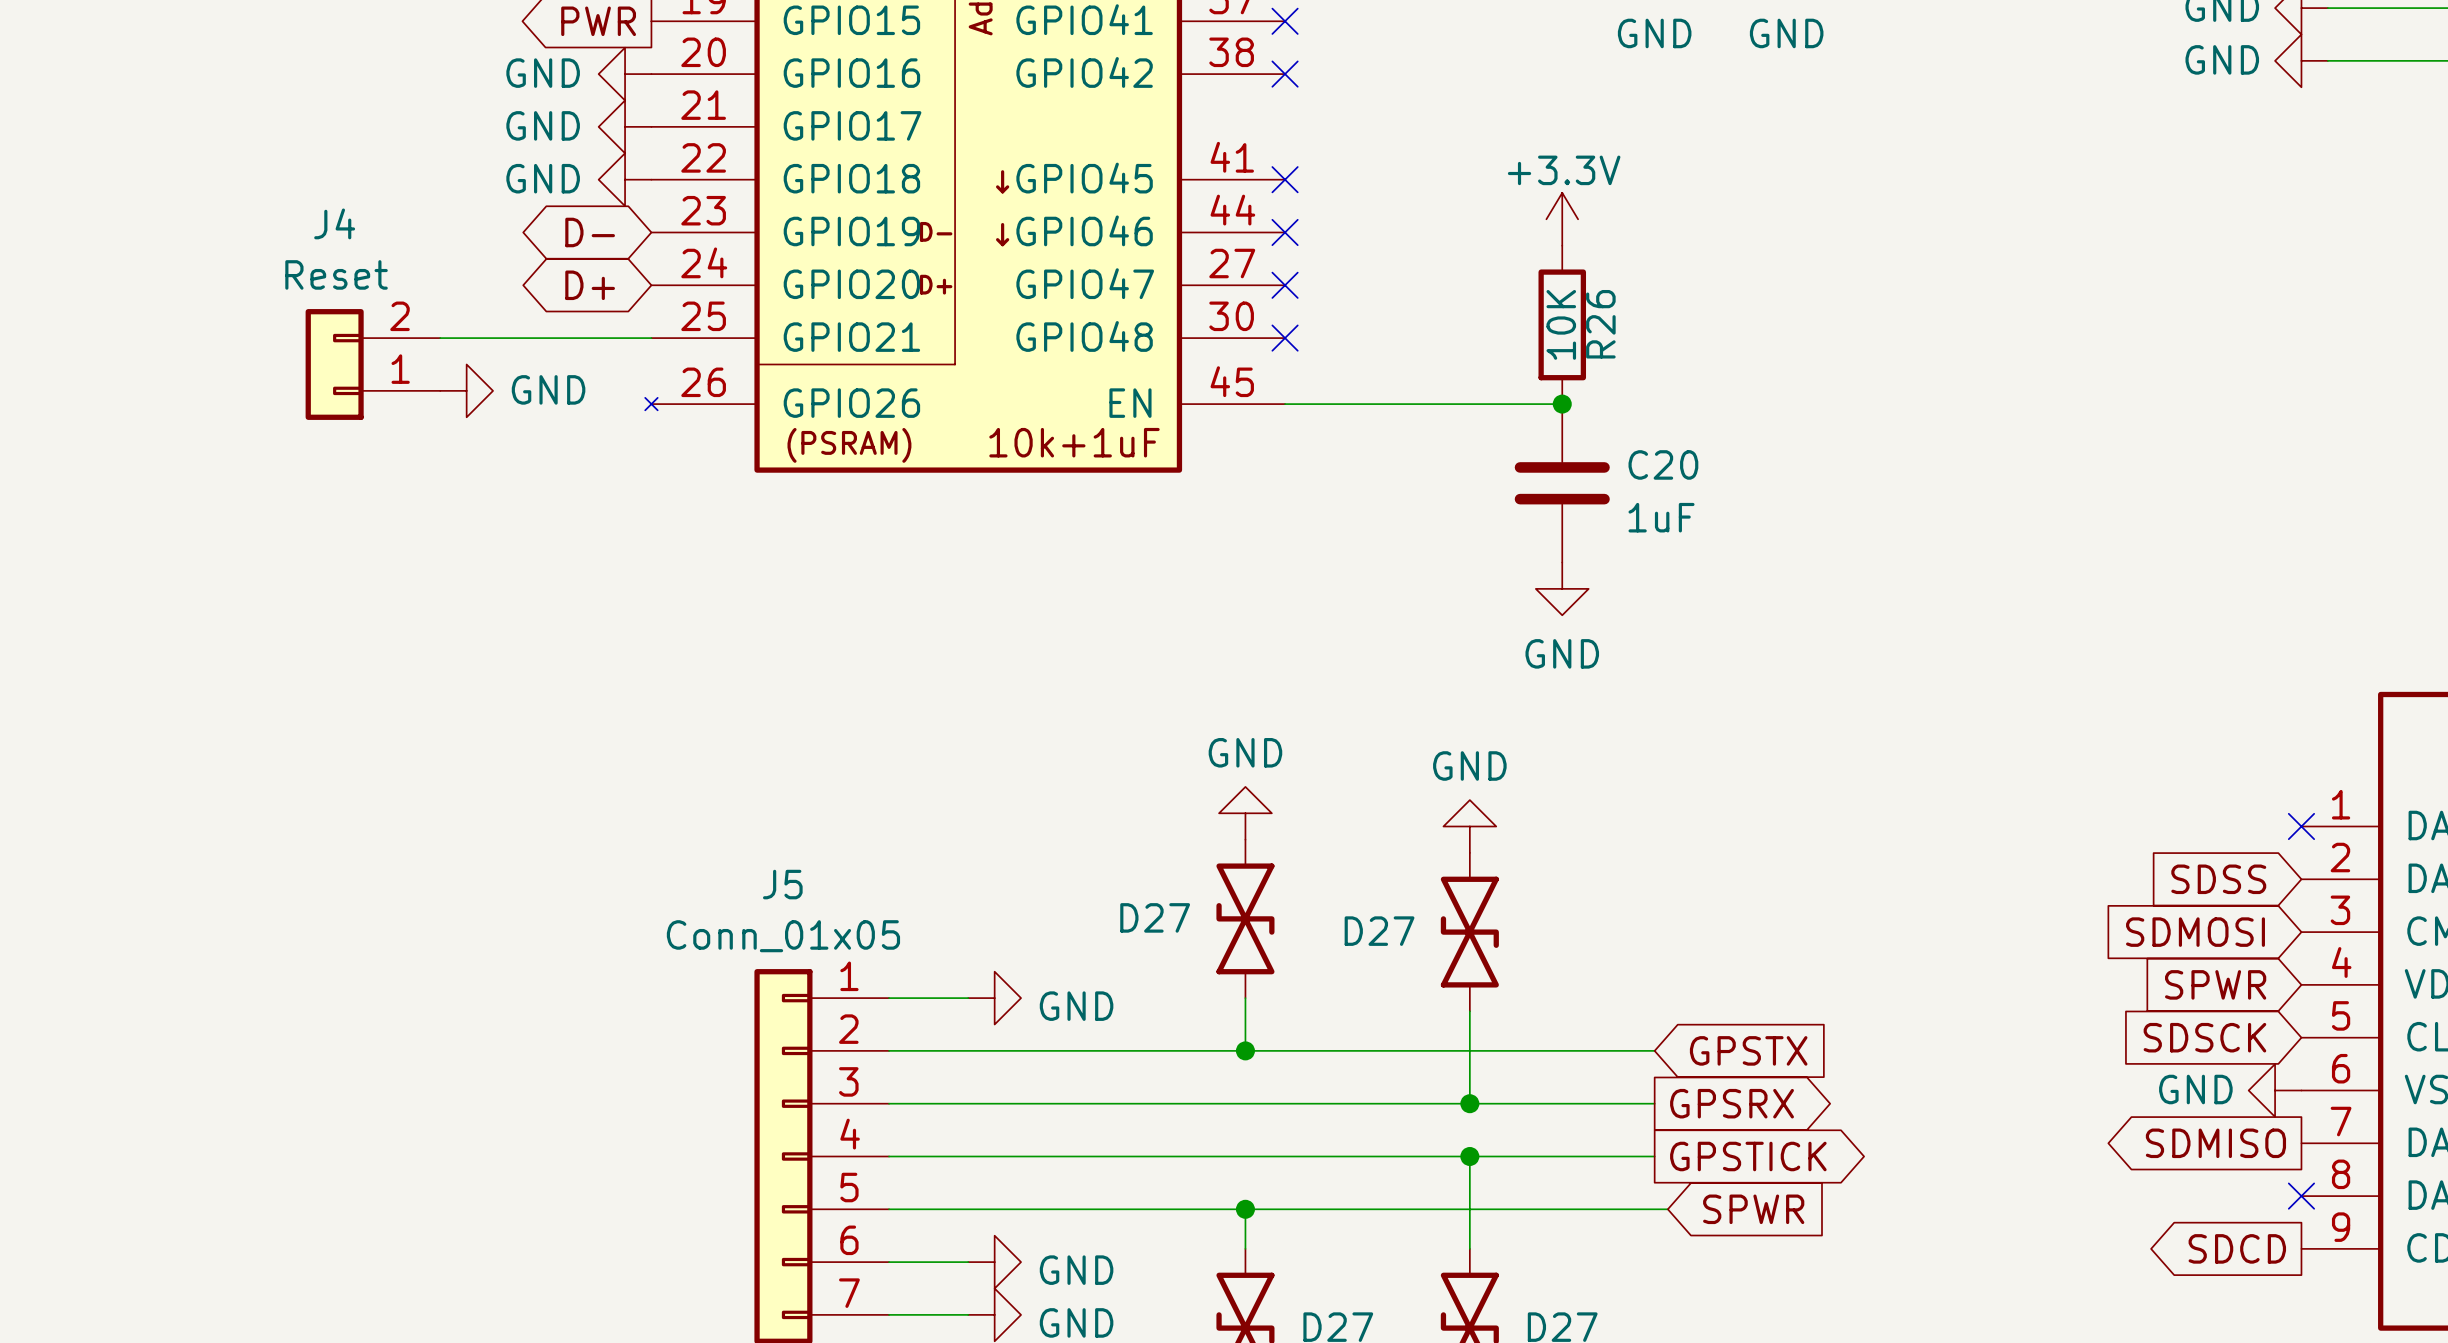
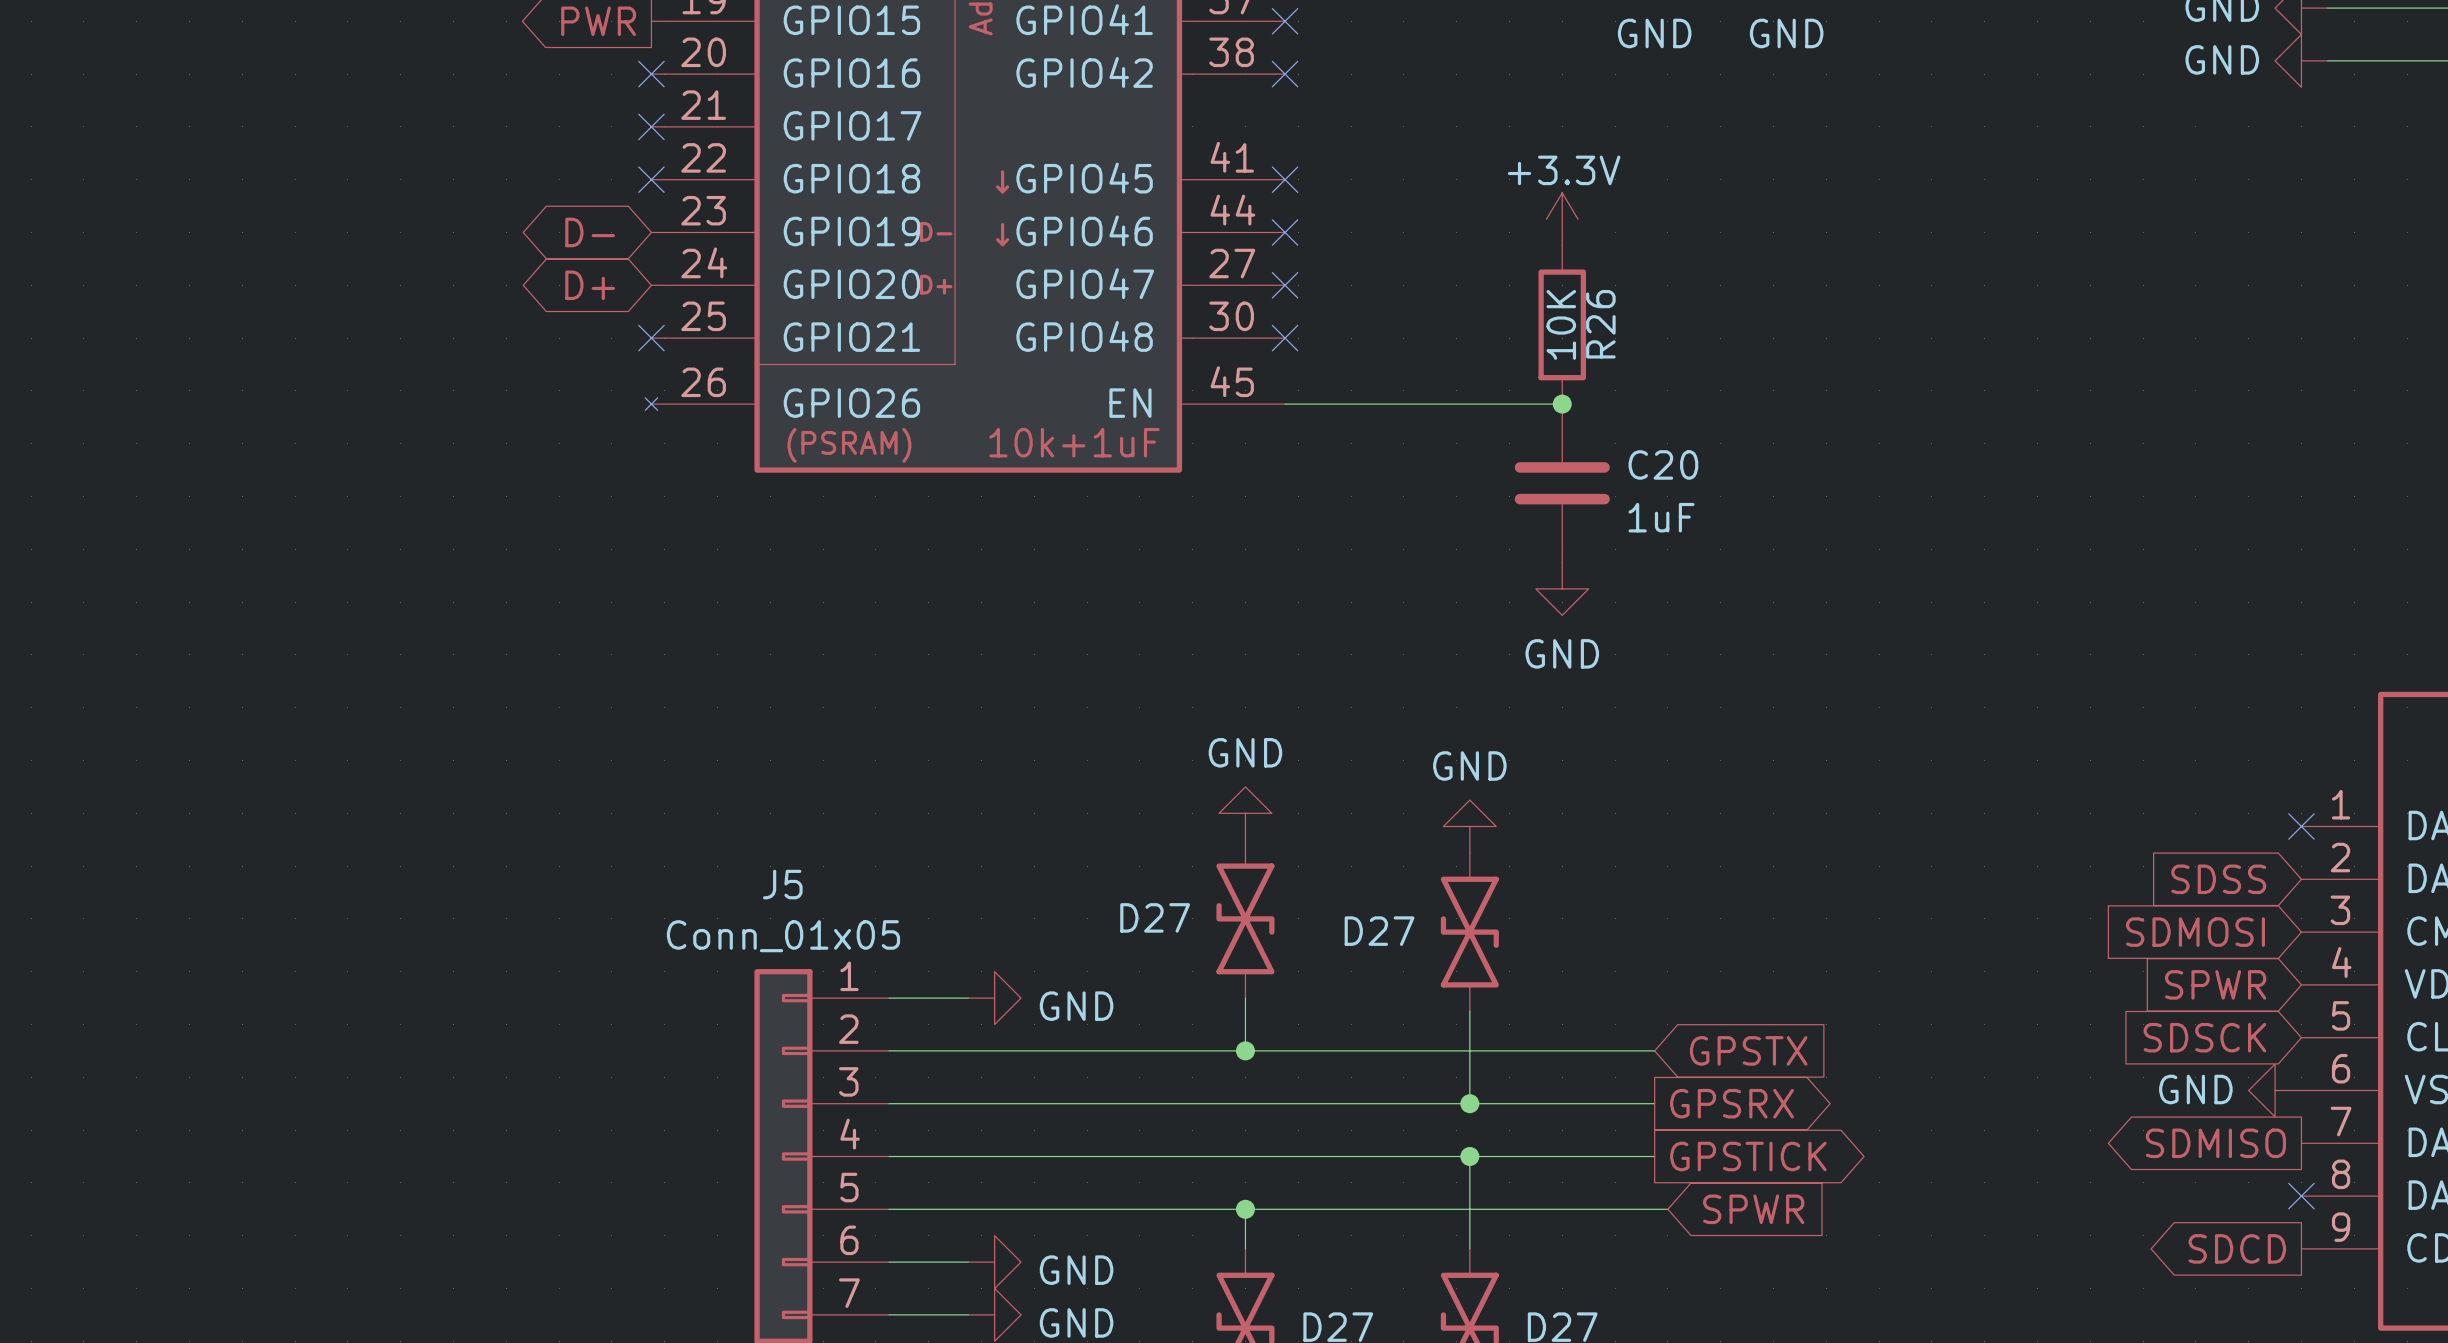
power symbol: GND (625, 74) -> none
no-connect mark: none -> (651, 74)
power symbol: GND (625, 126) -> none
no-connect mark: none -> (651, 126)
power symbol: GND (625, 179) -> none
no-connect mark: none -> (651, 179)
wire: (440, 338) (651, 338) -> none
no-connect mark: none -> (651, 338)
J4: Reset (372, 364) -> none
power symbol: GND (466, 390) -> none

